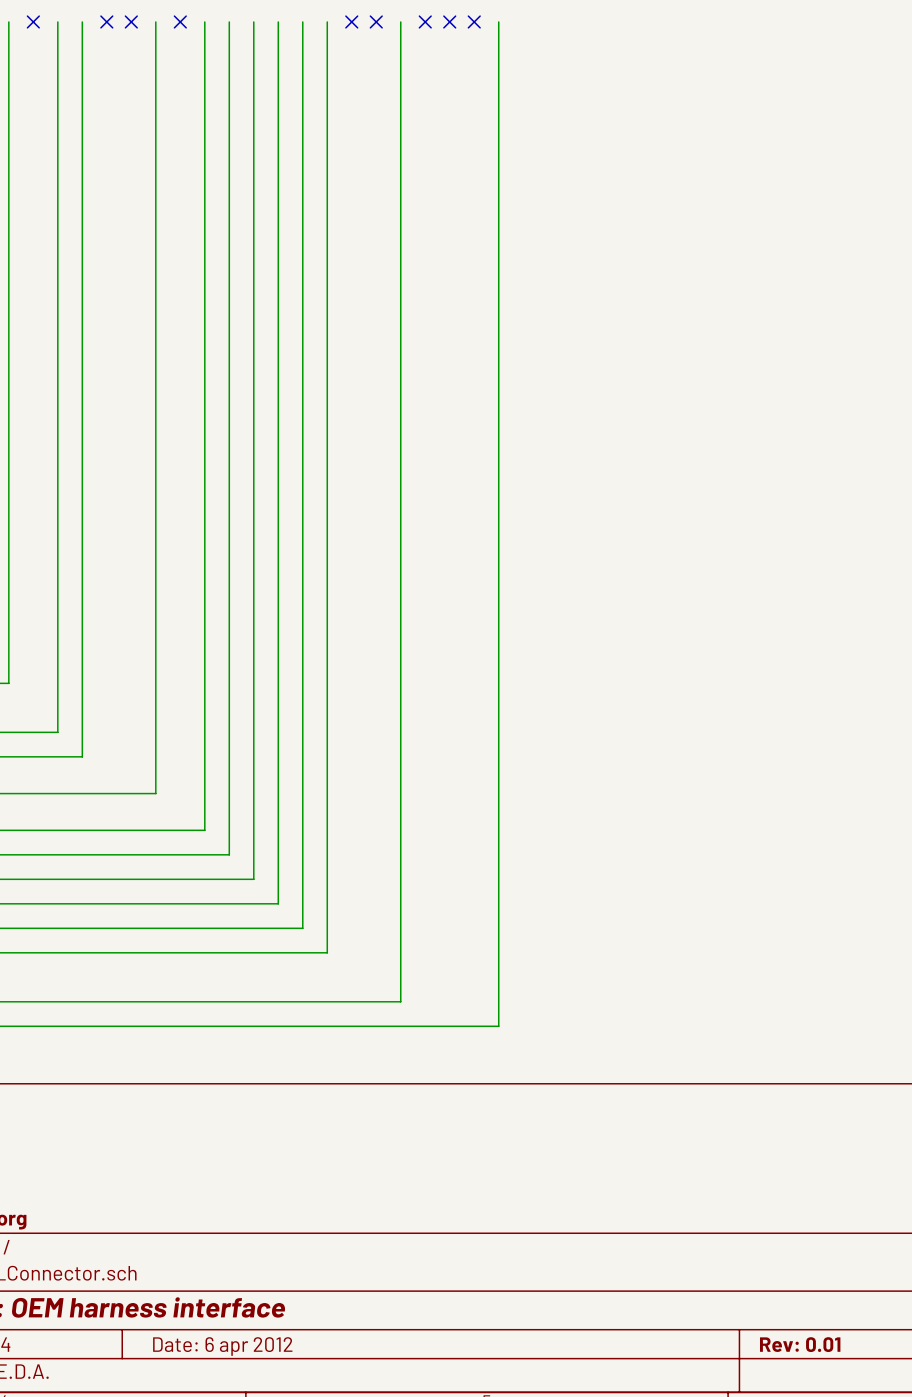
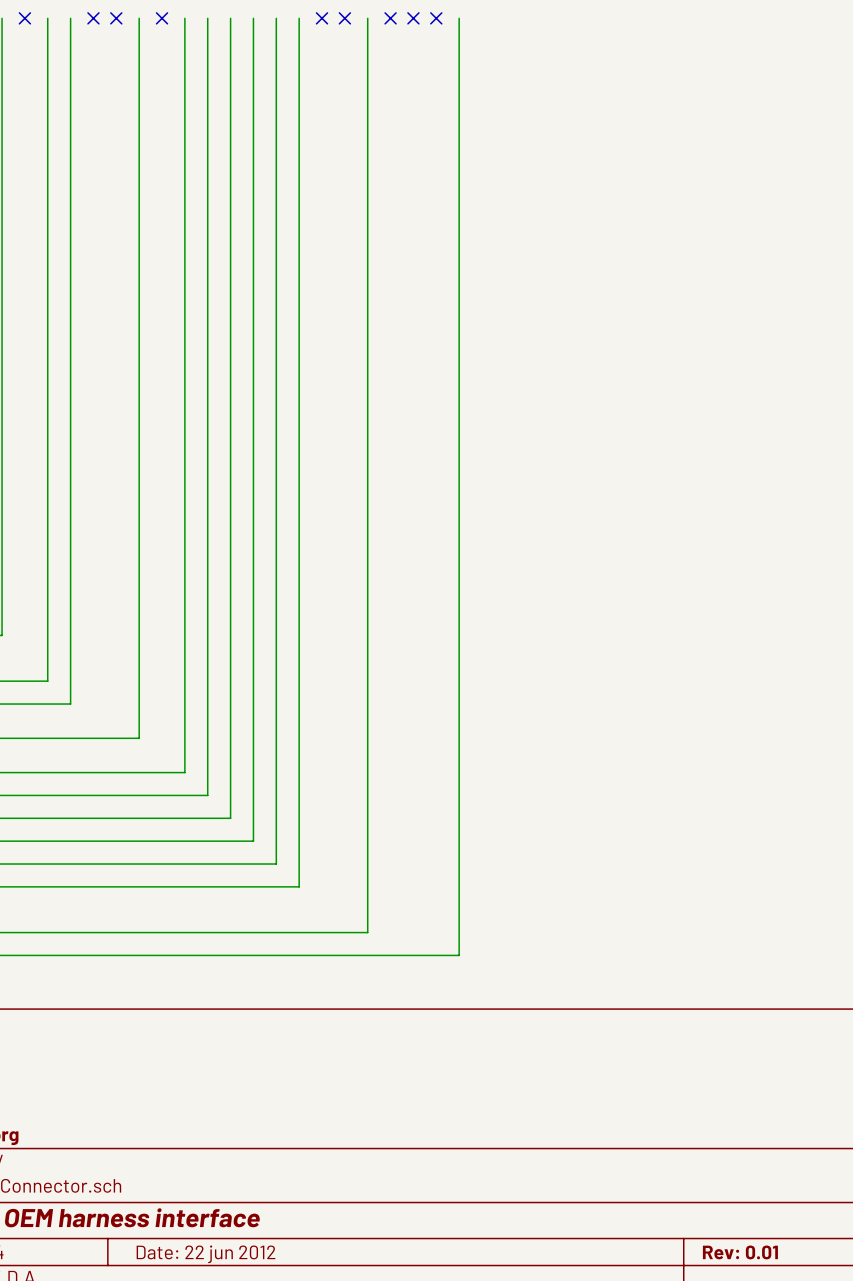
title block: Date: 6 apr 2012 (222, 1346) -> Date: 22 jun 2012 (206, 1254)

